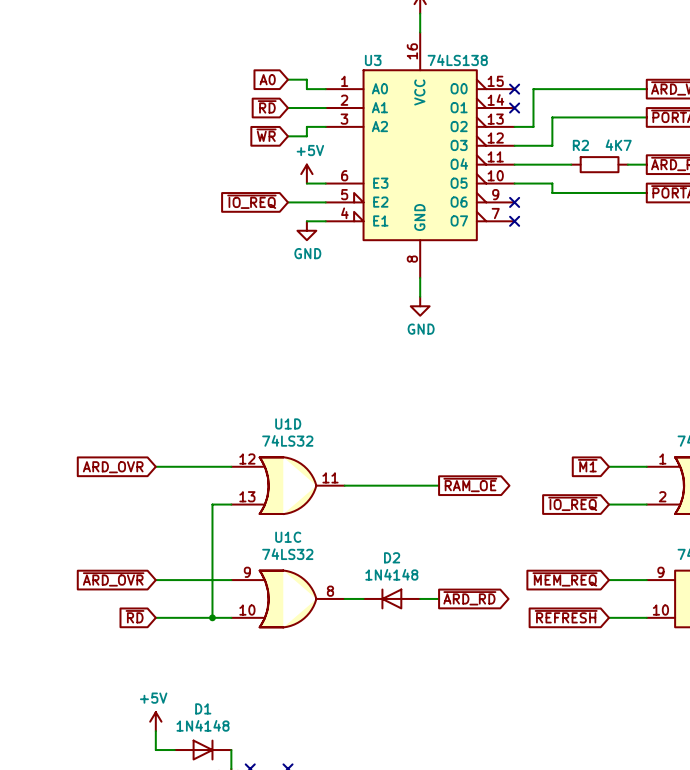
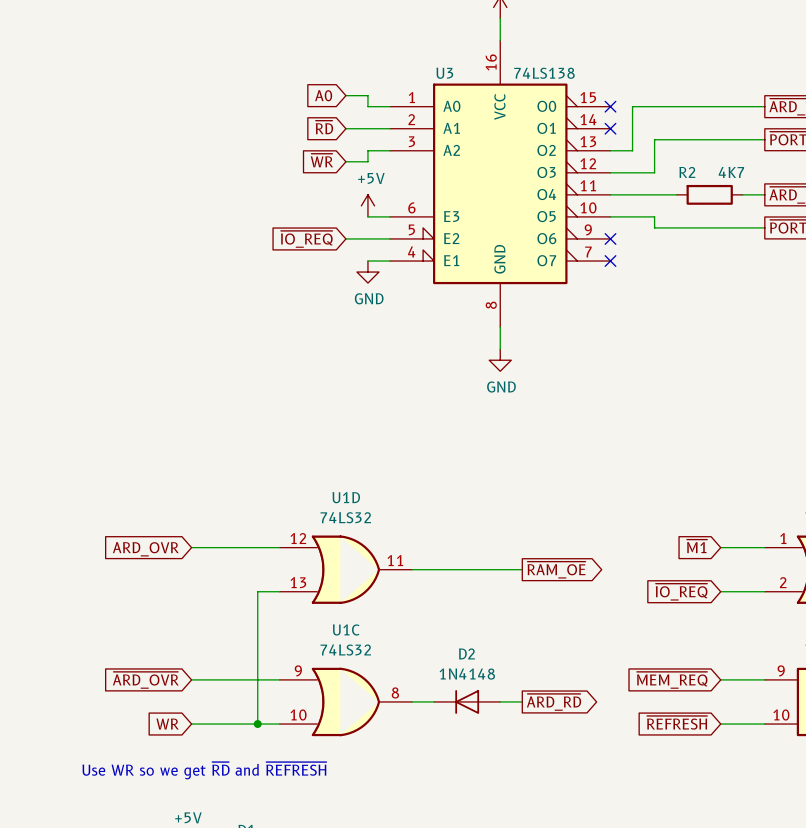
global label: ~{RD} (135, 616) -> WR (167, 724)
text: none -> Use WR so we get ~{RD} and ~{REFRESH} (204, 770)

